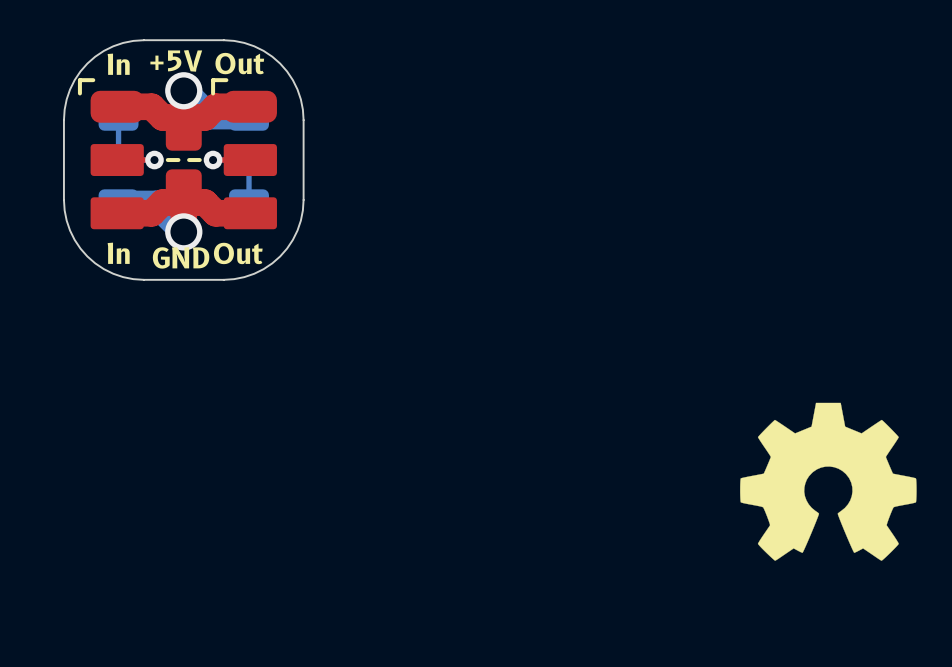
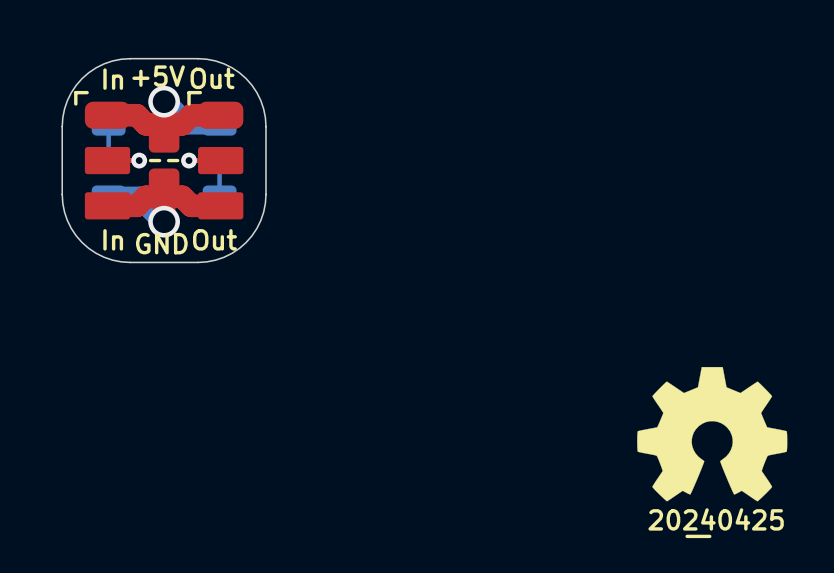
drawing: none -> [685, 534, 712, 539]

